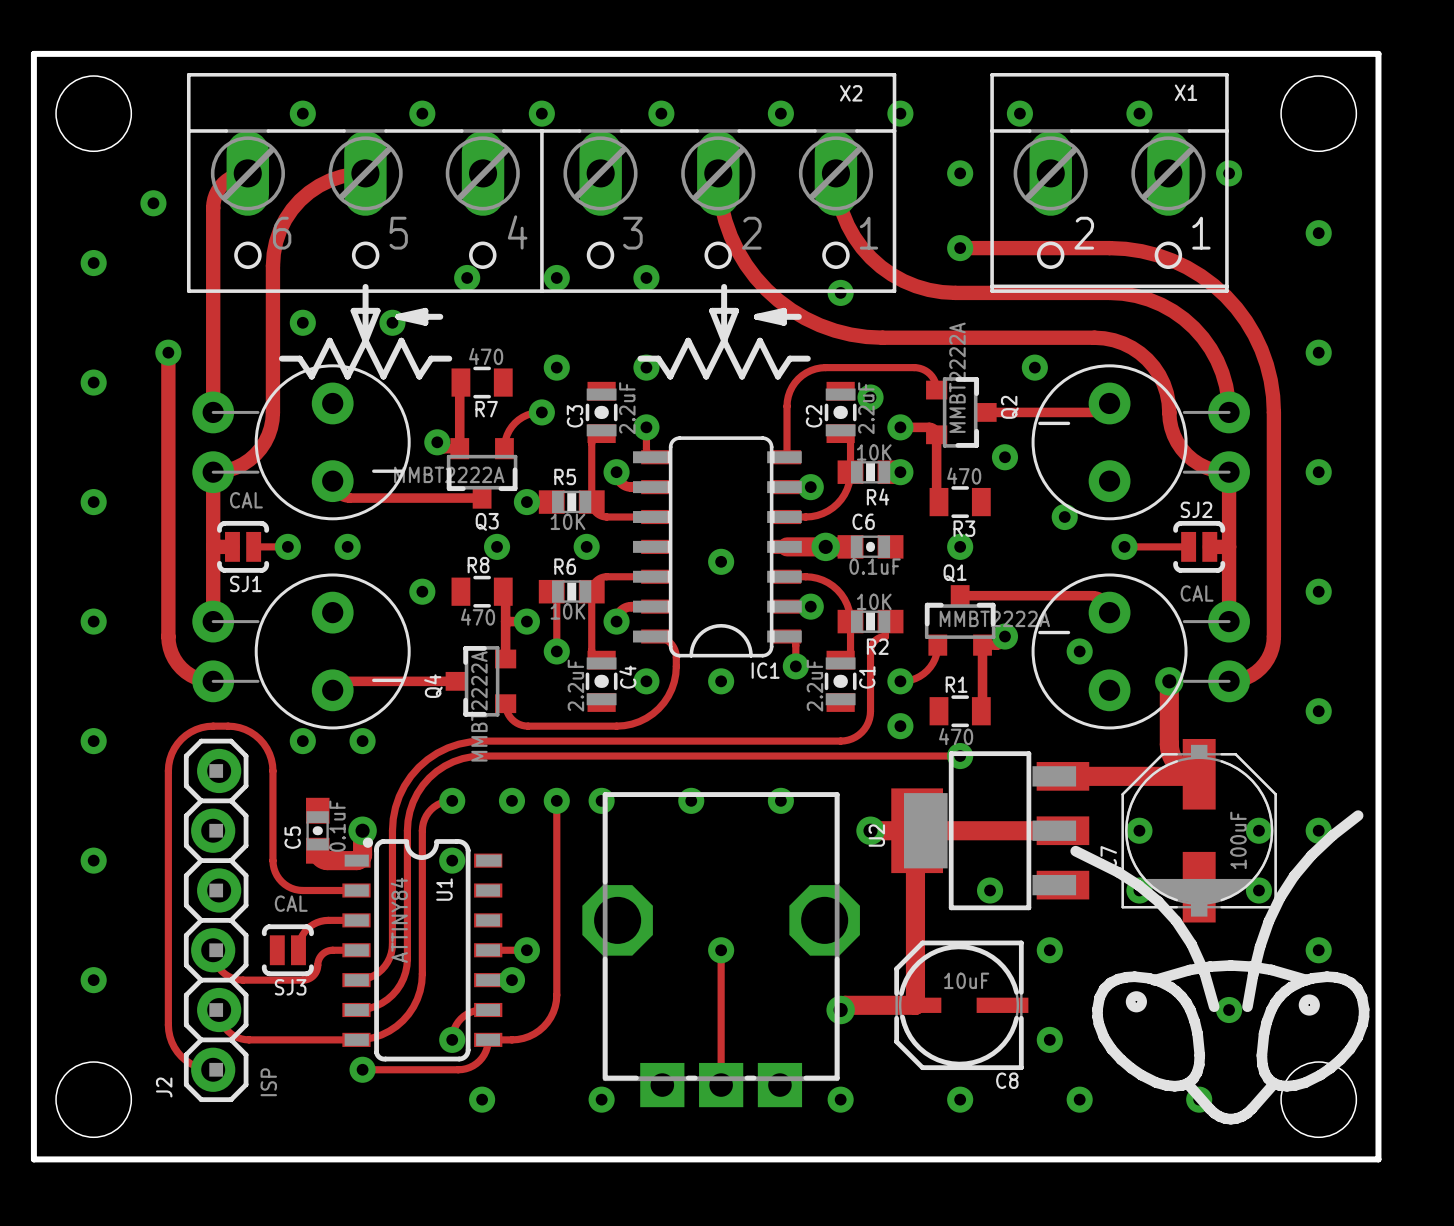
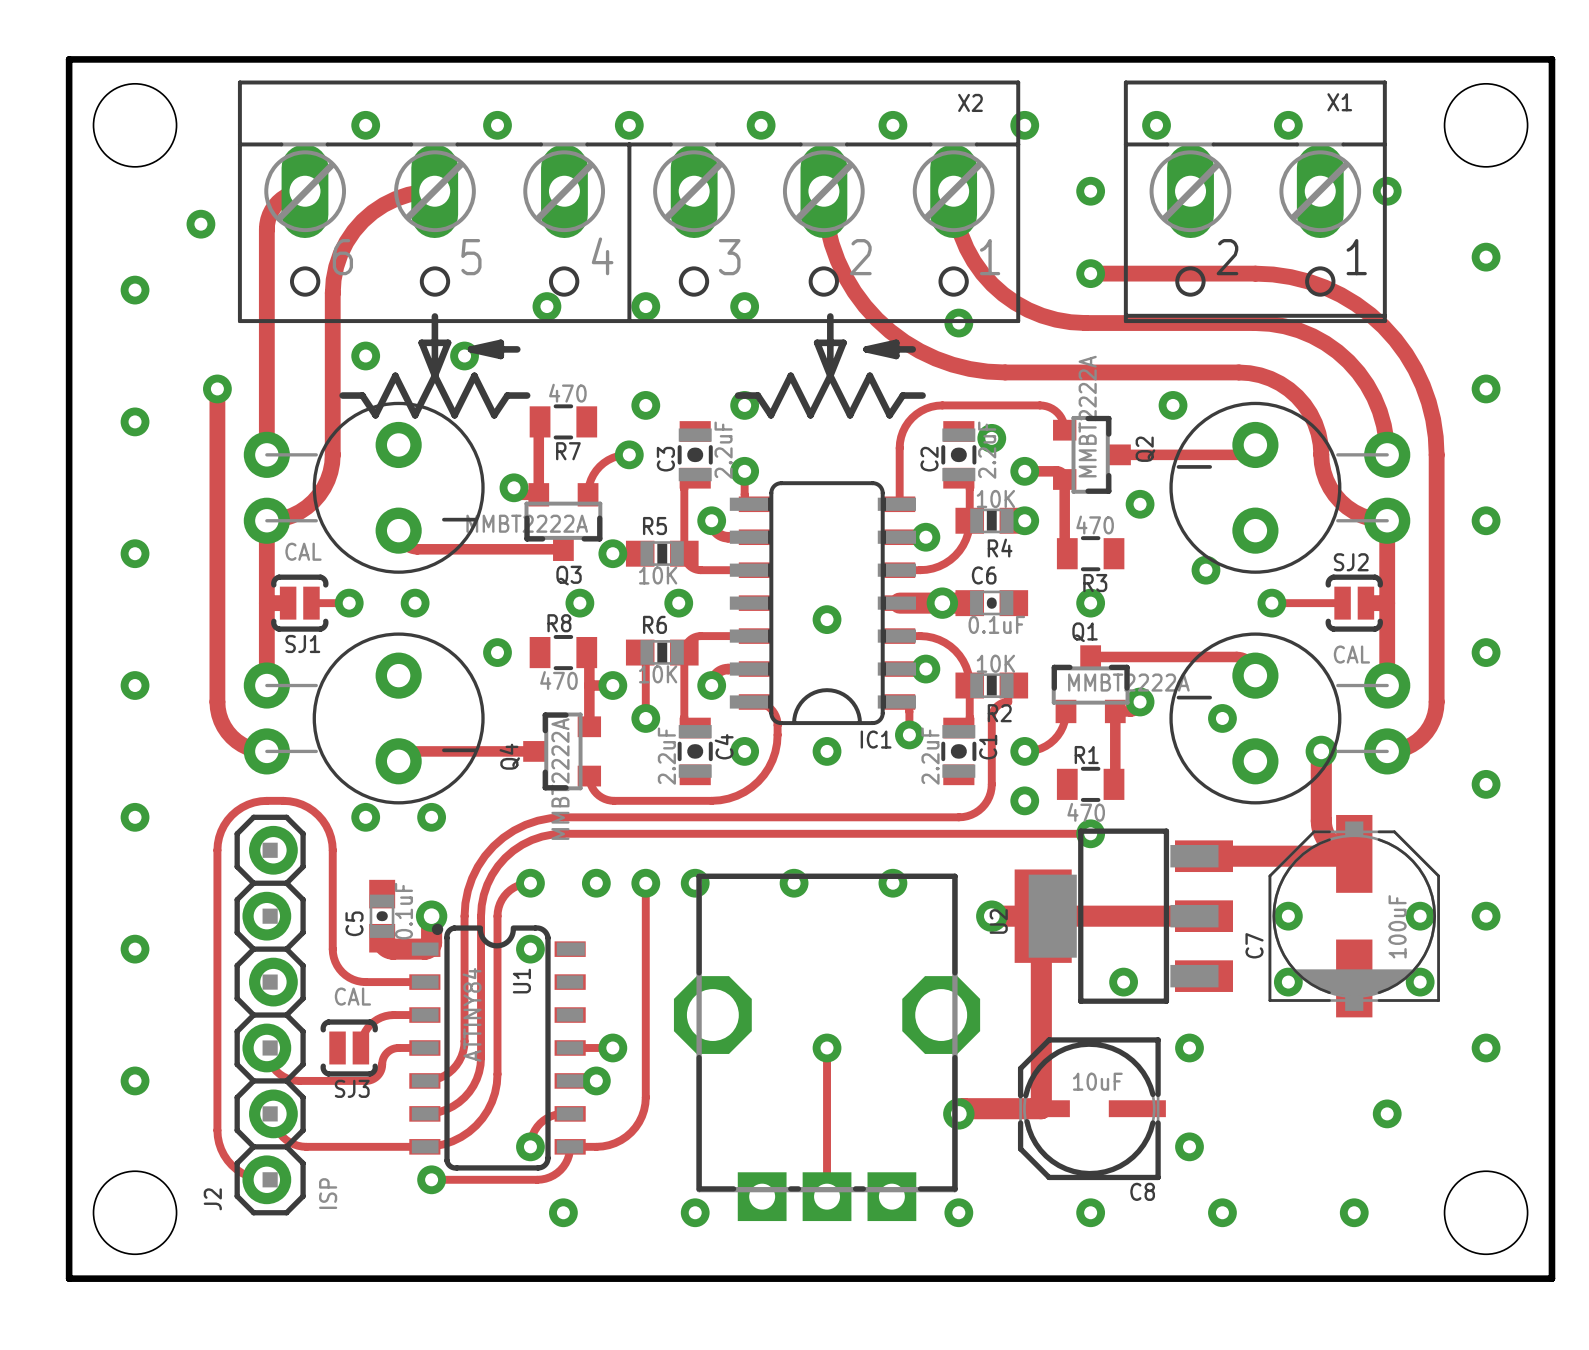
drawing: [1070, 810, 1370, 1125] -> none

